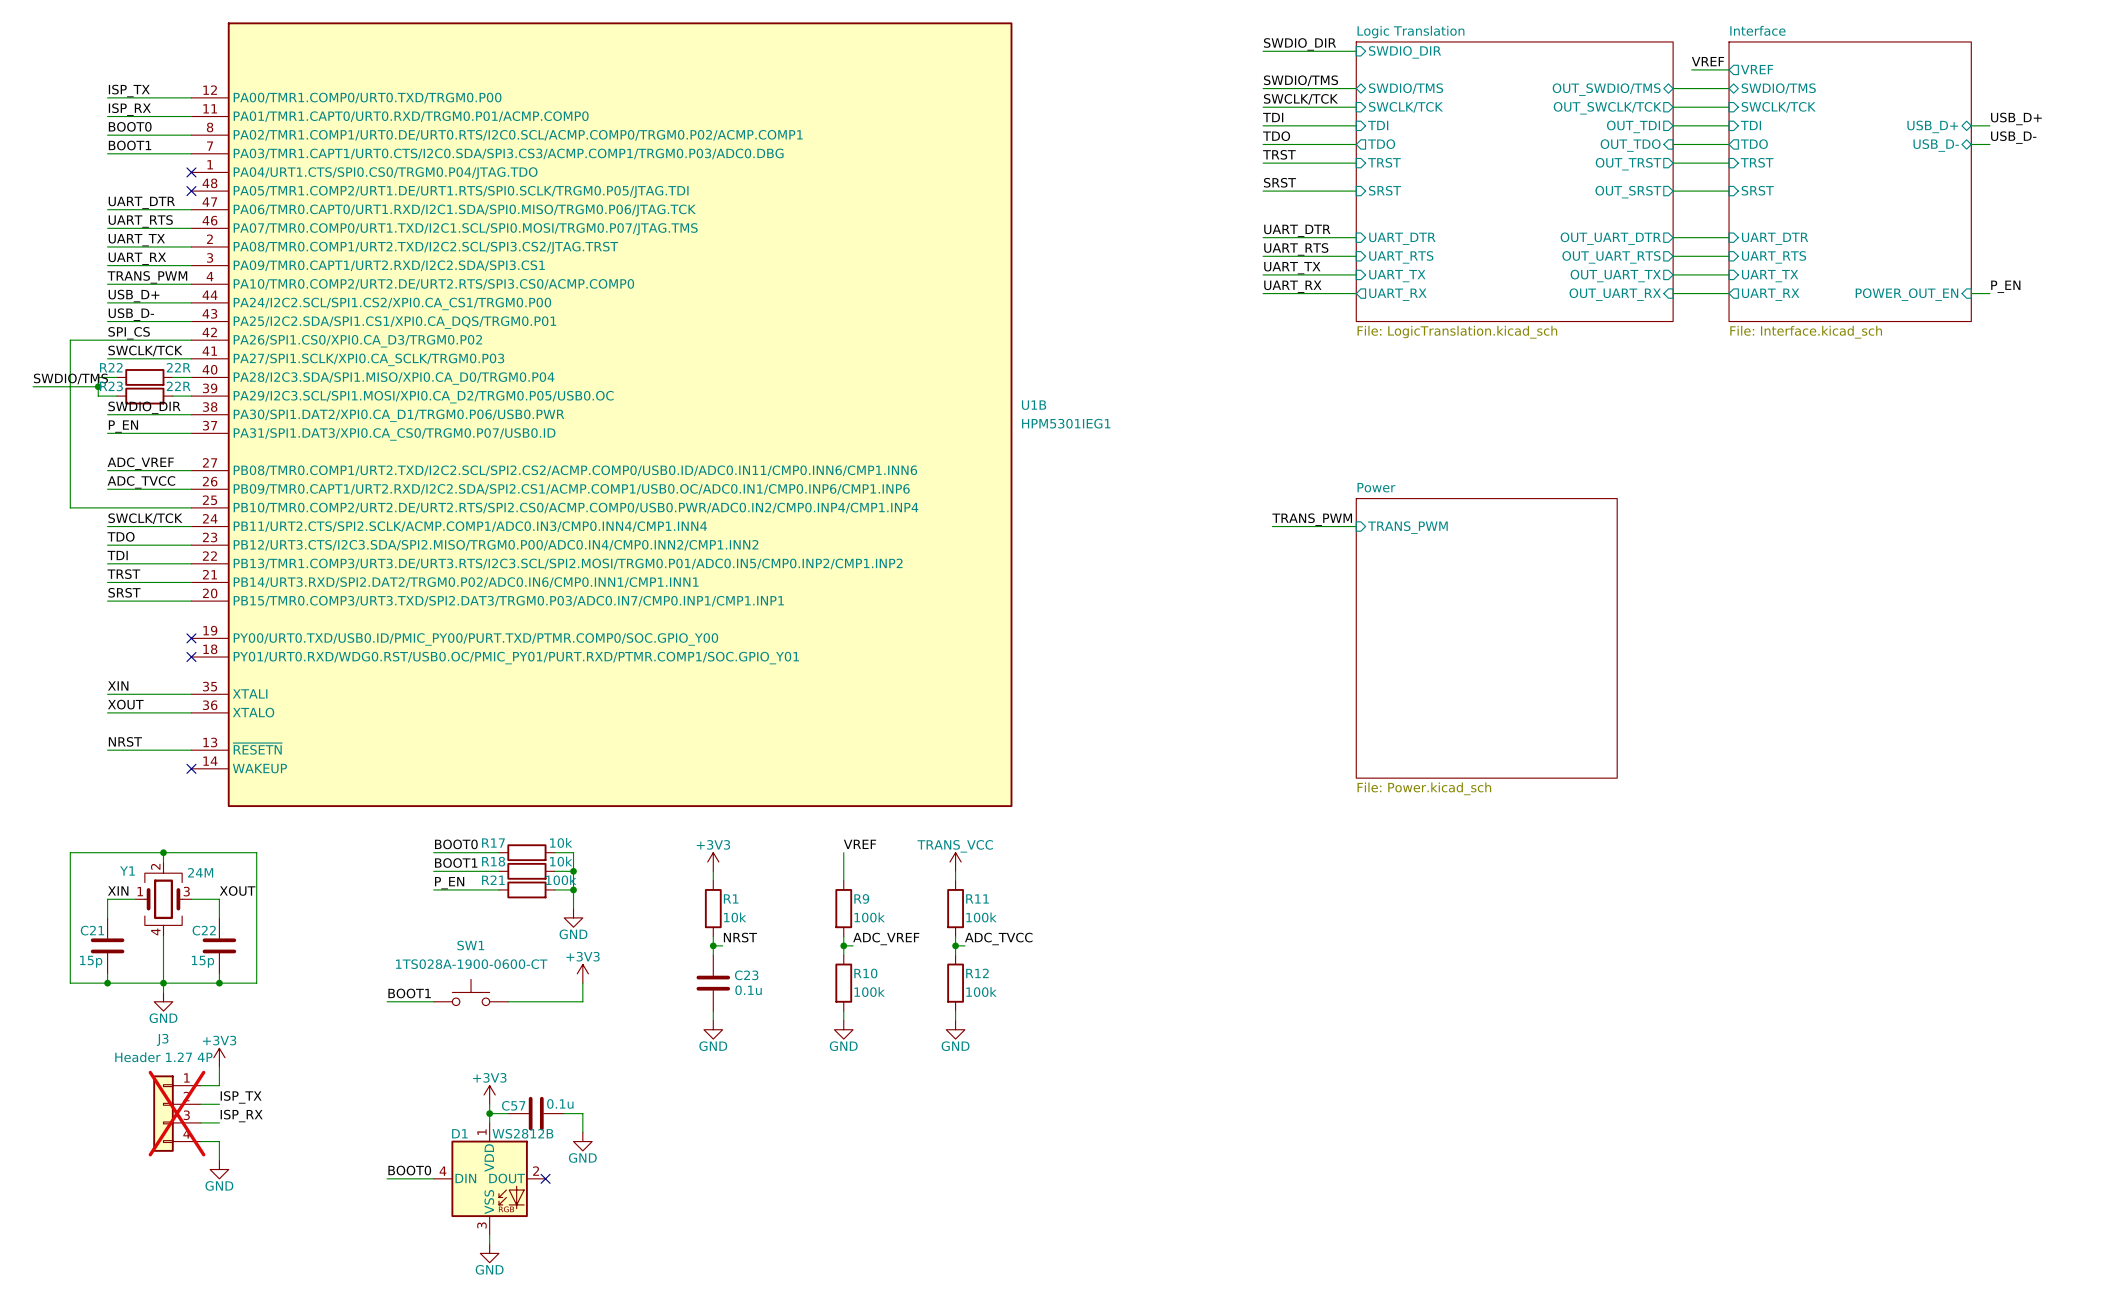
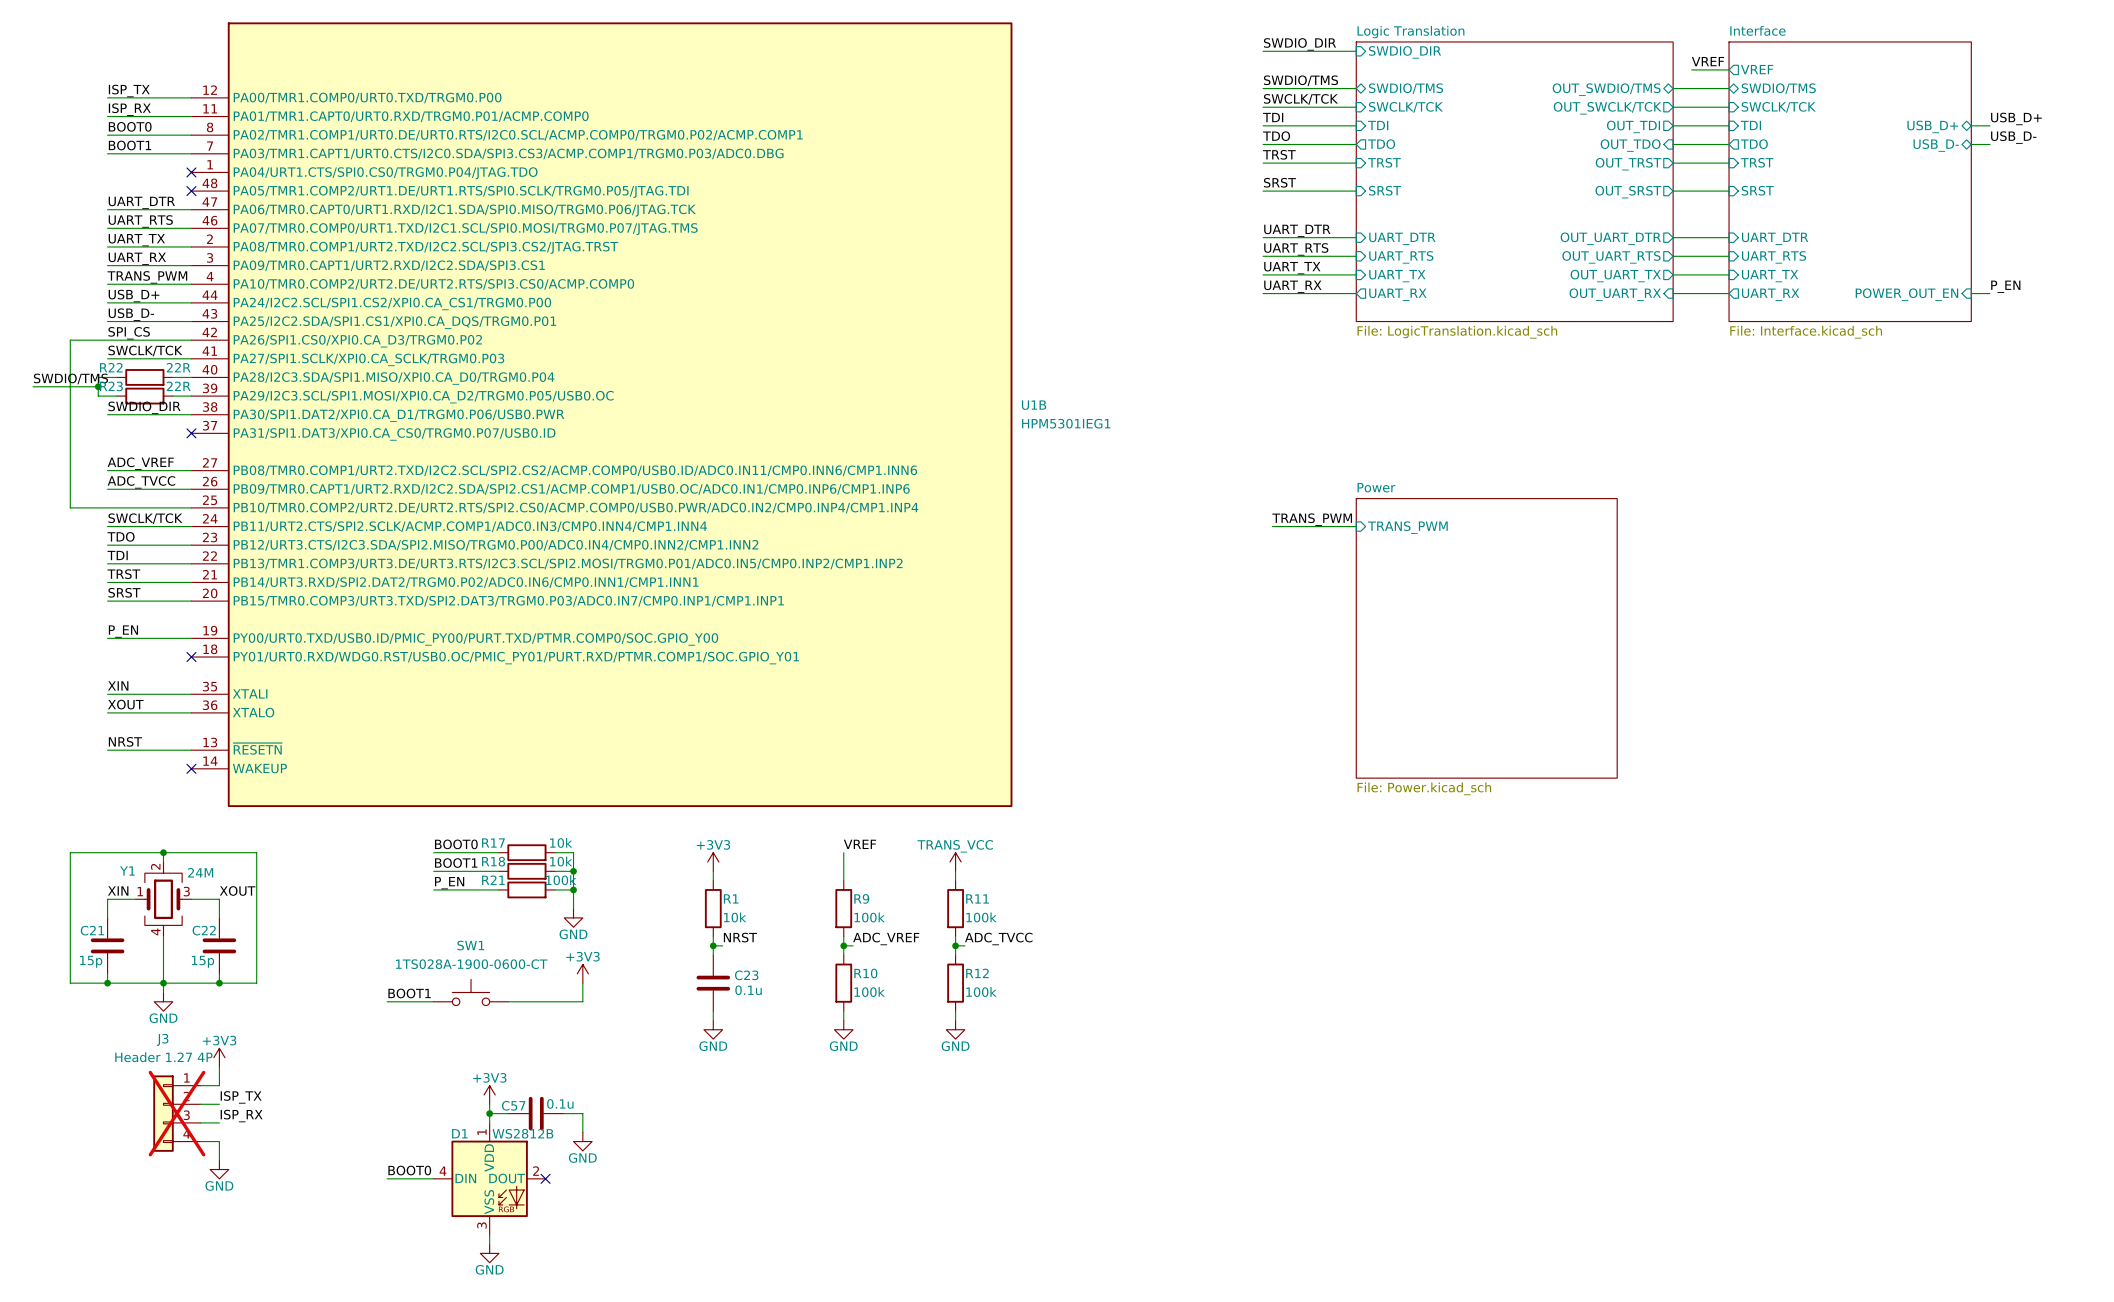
label: P_EN (123, 426) -> none
wire: (107, 433) (191, 433) -> none
no-connect mark: none -> (191, 433)
label: none -> P_EN (123, 631)
wire: none -> (107, 638) (191, 638)
no-connect mark: (191, 638) -> none

